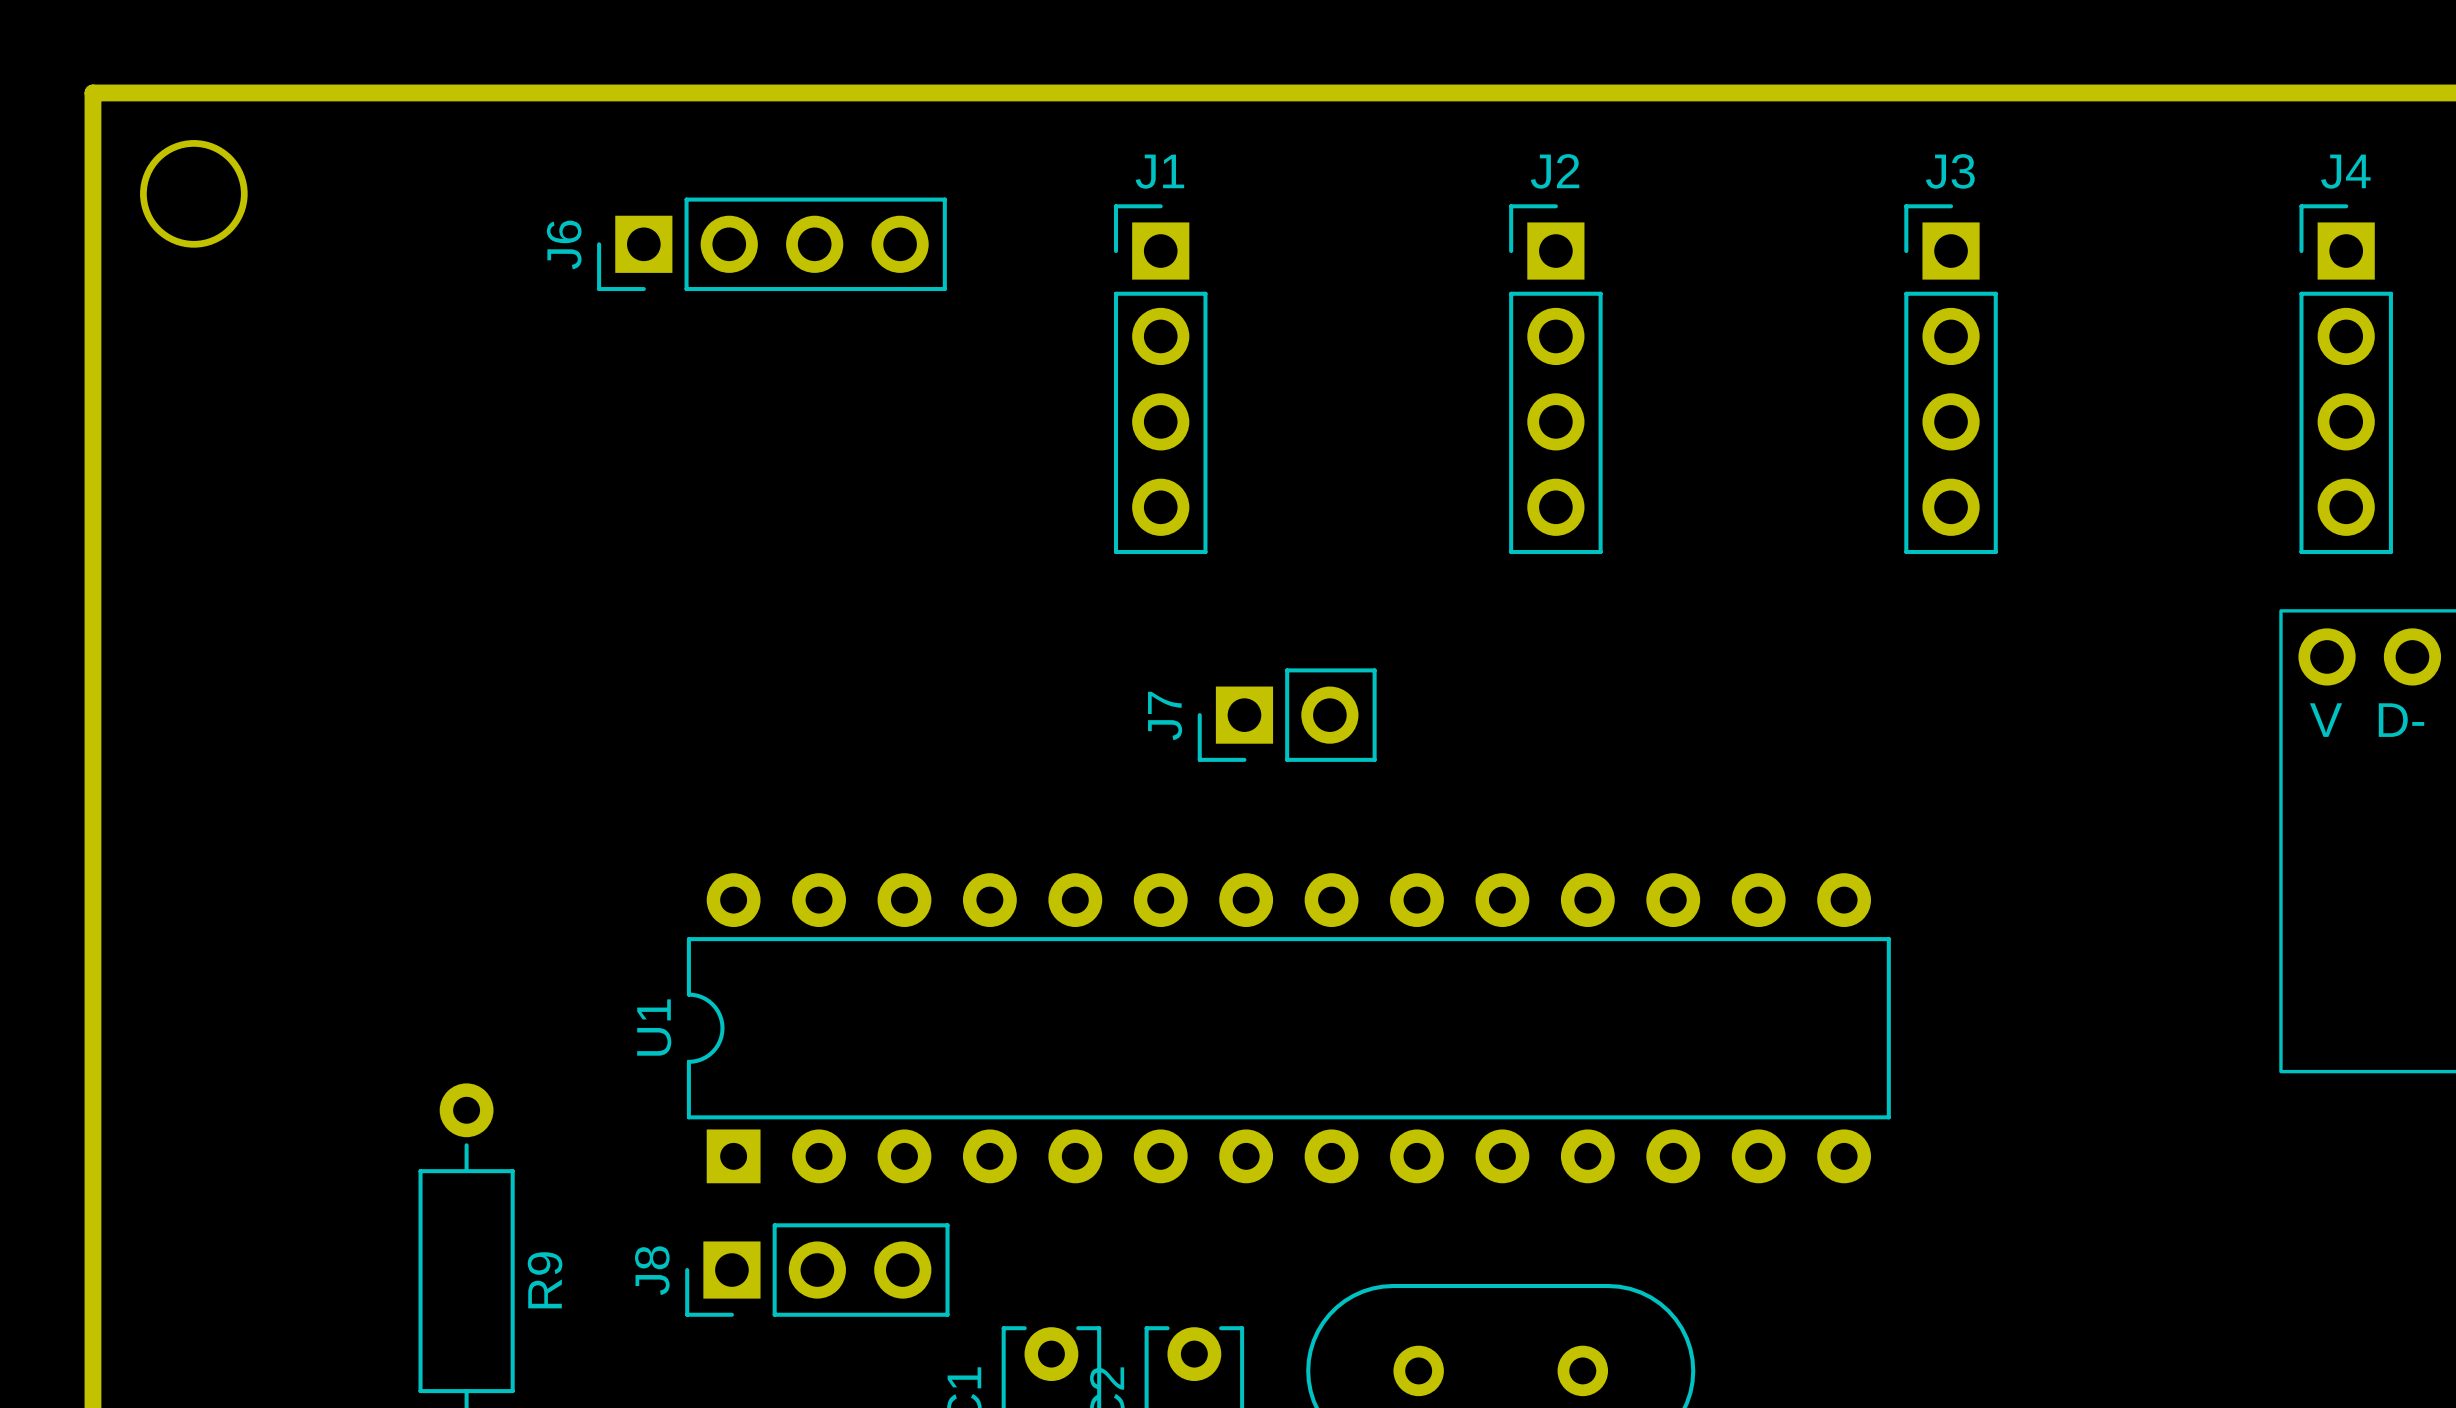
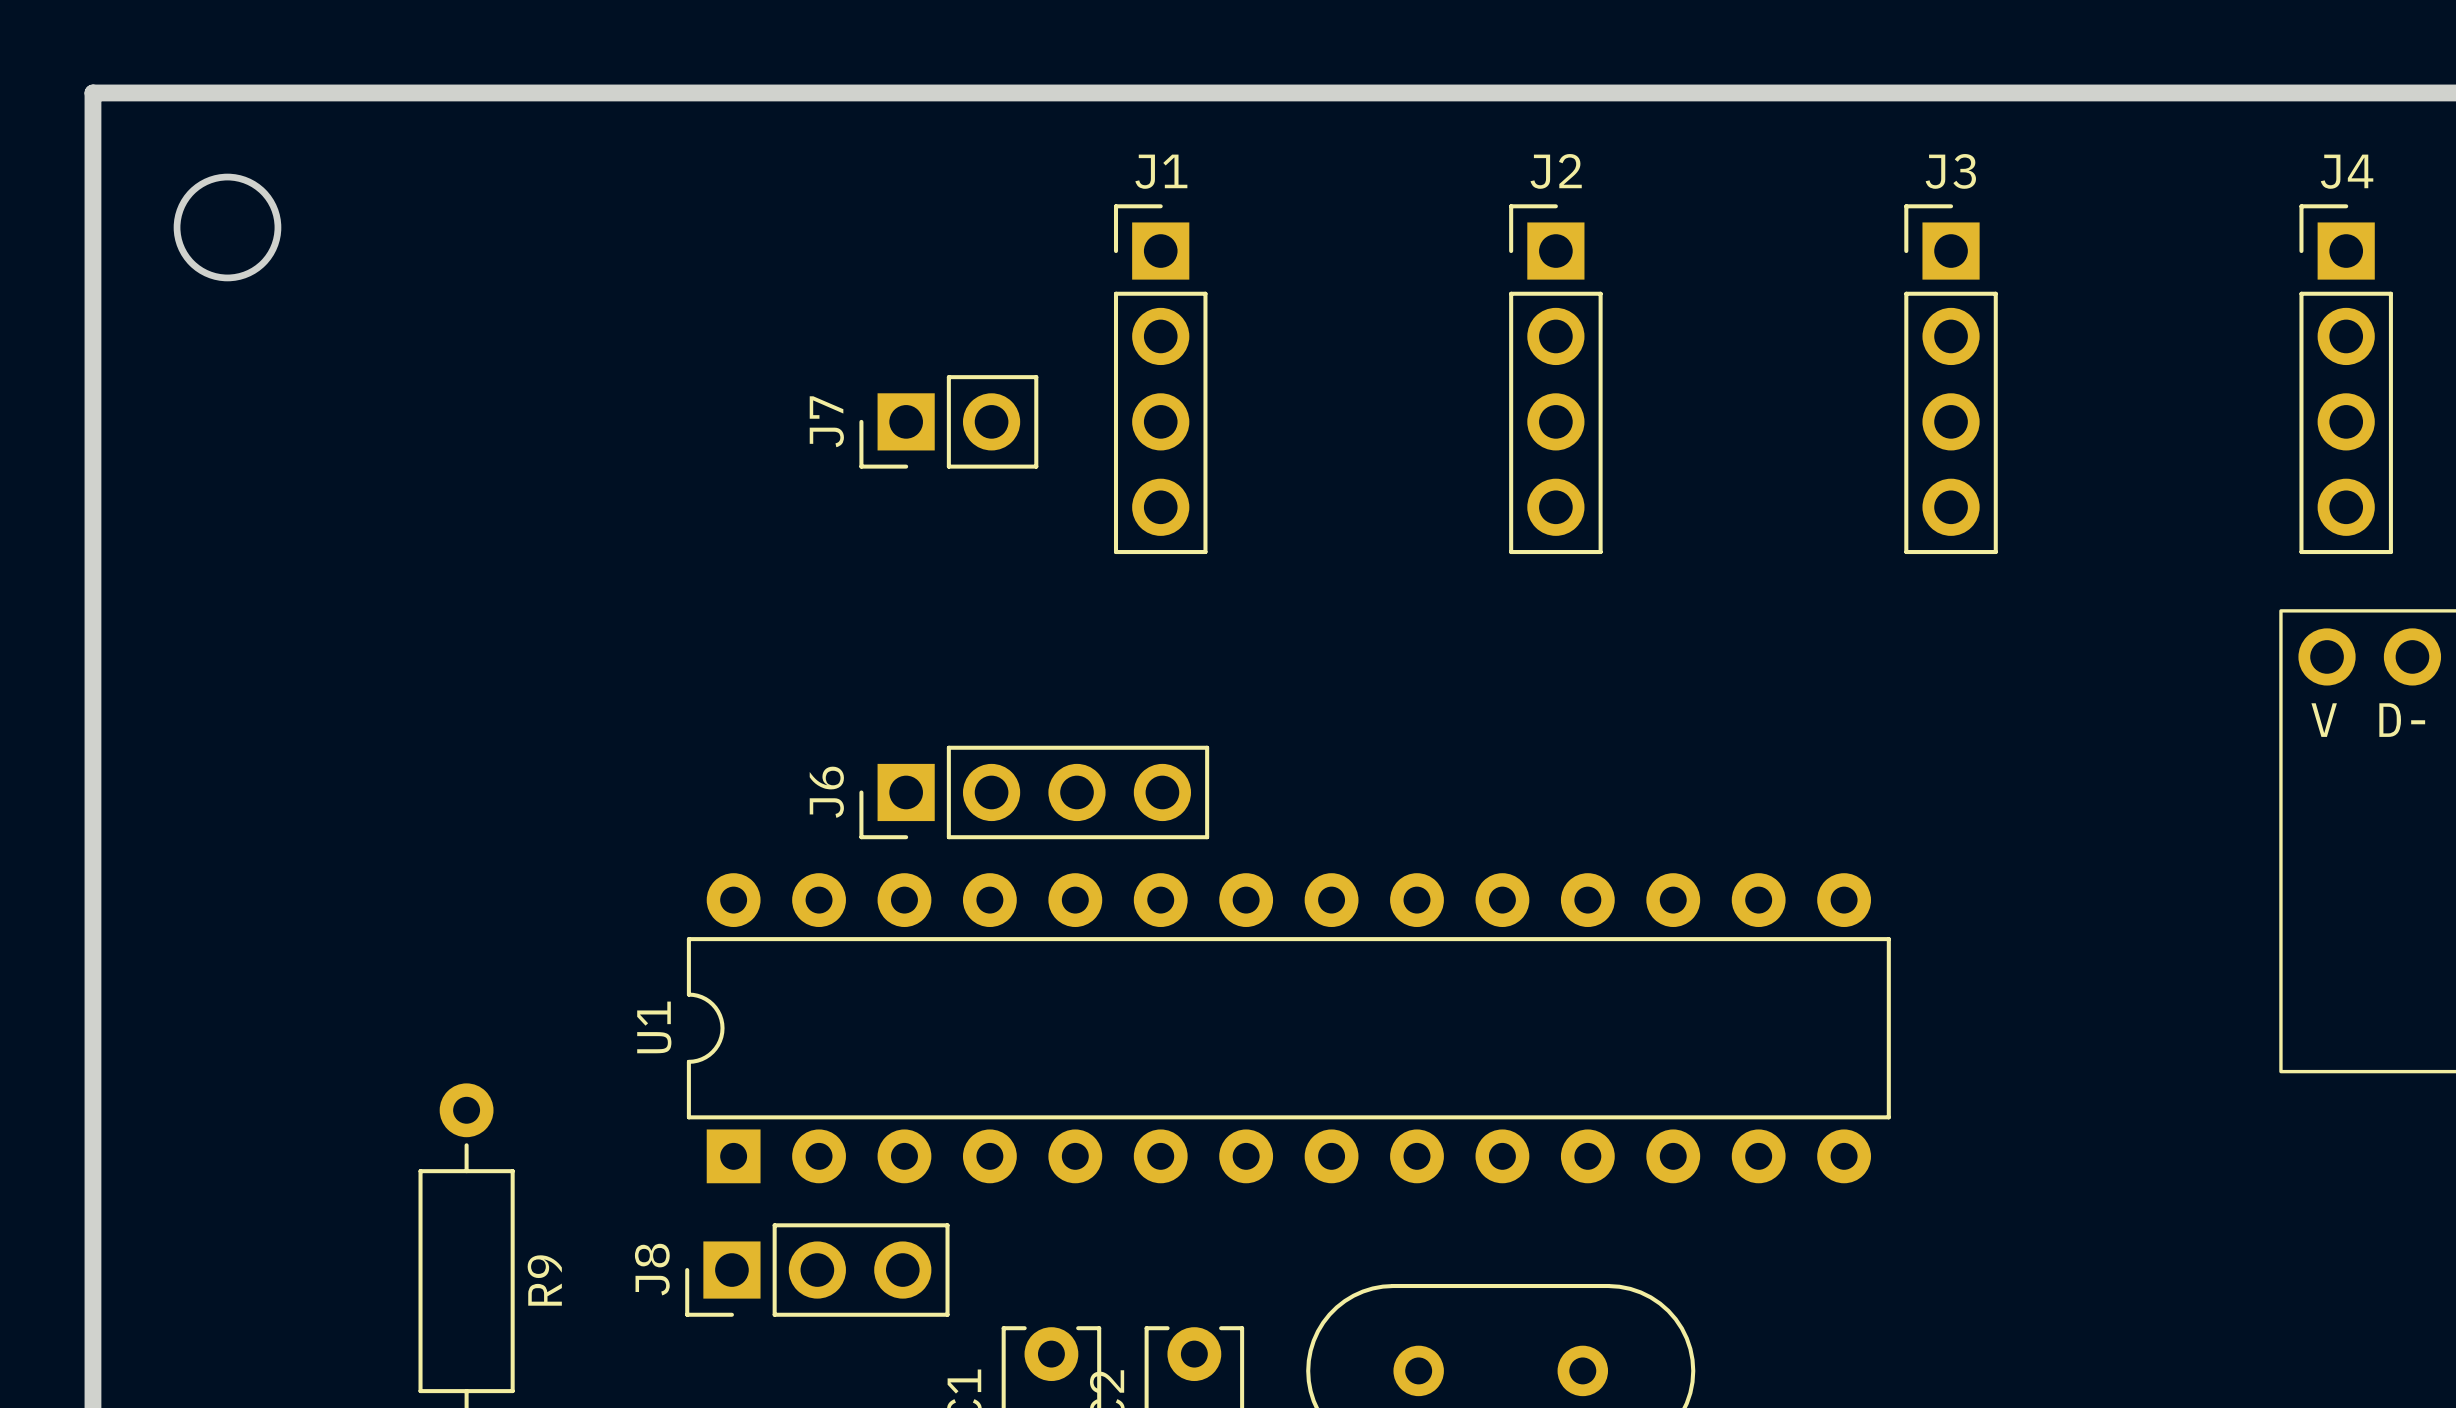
round board edge position: (193, 193) -> (227, 227)
J6 position: (771, 244) -> (1034, 792)
J7 position: (1287, 715) -> (948, 421)

